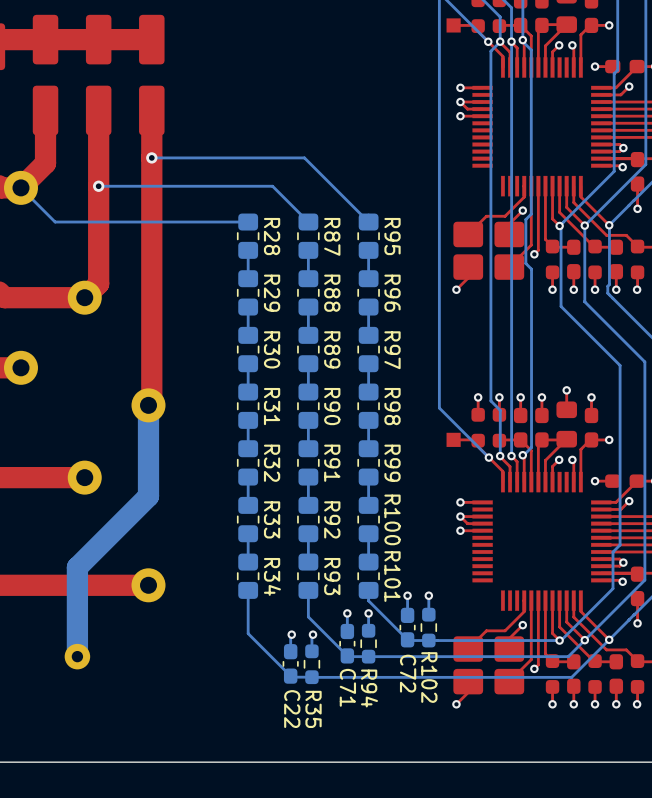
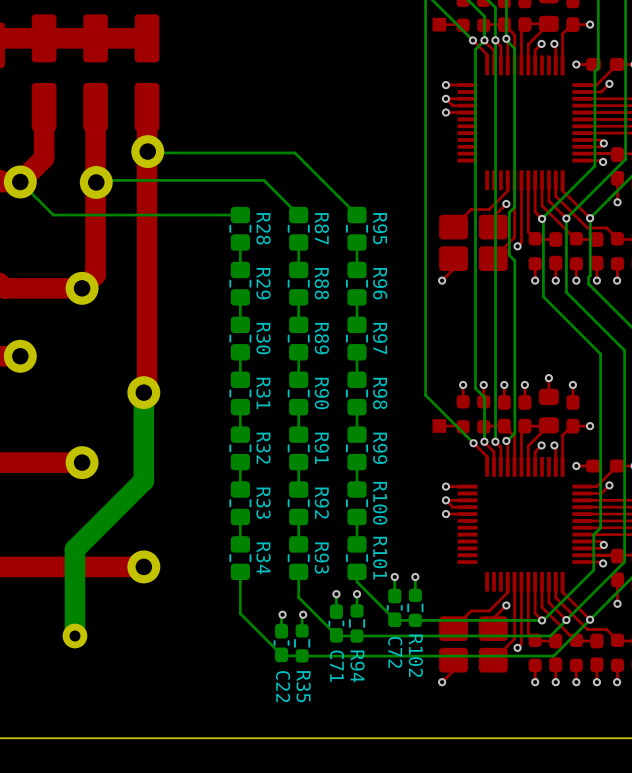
part: none -> (147, 151)
via: (151, 157) -> none
via: (98, 186) -> none
part: none -> (96, 182)

